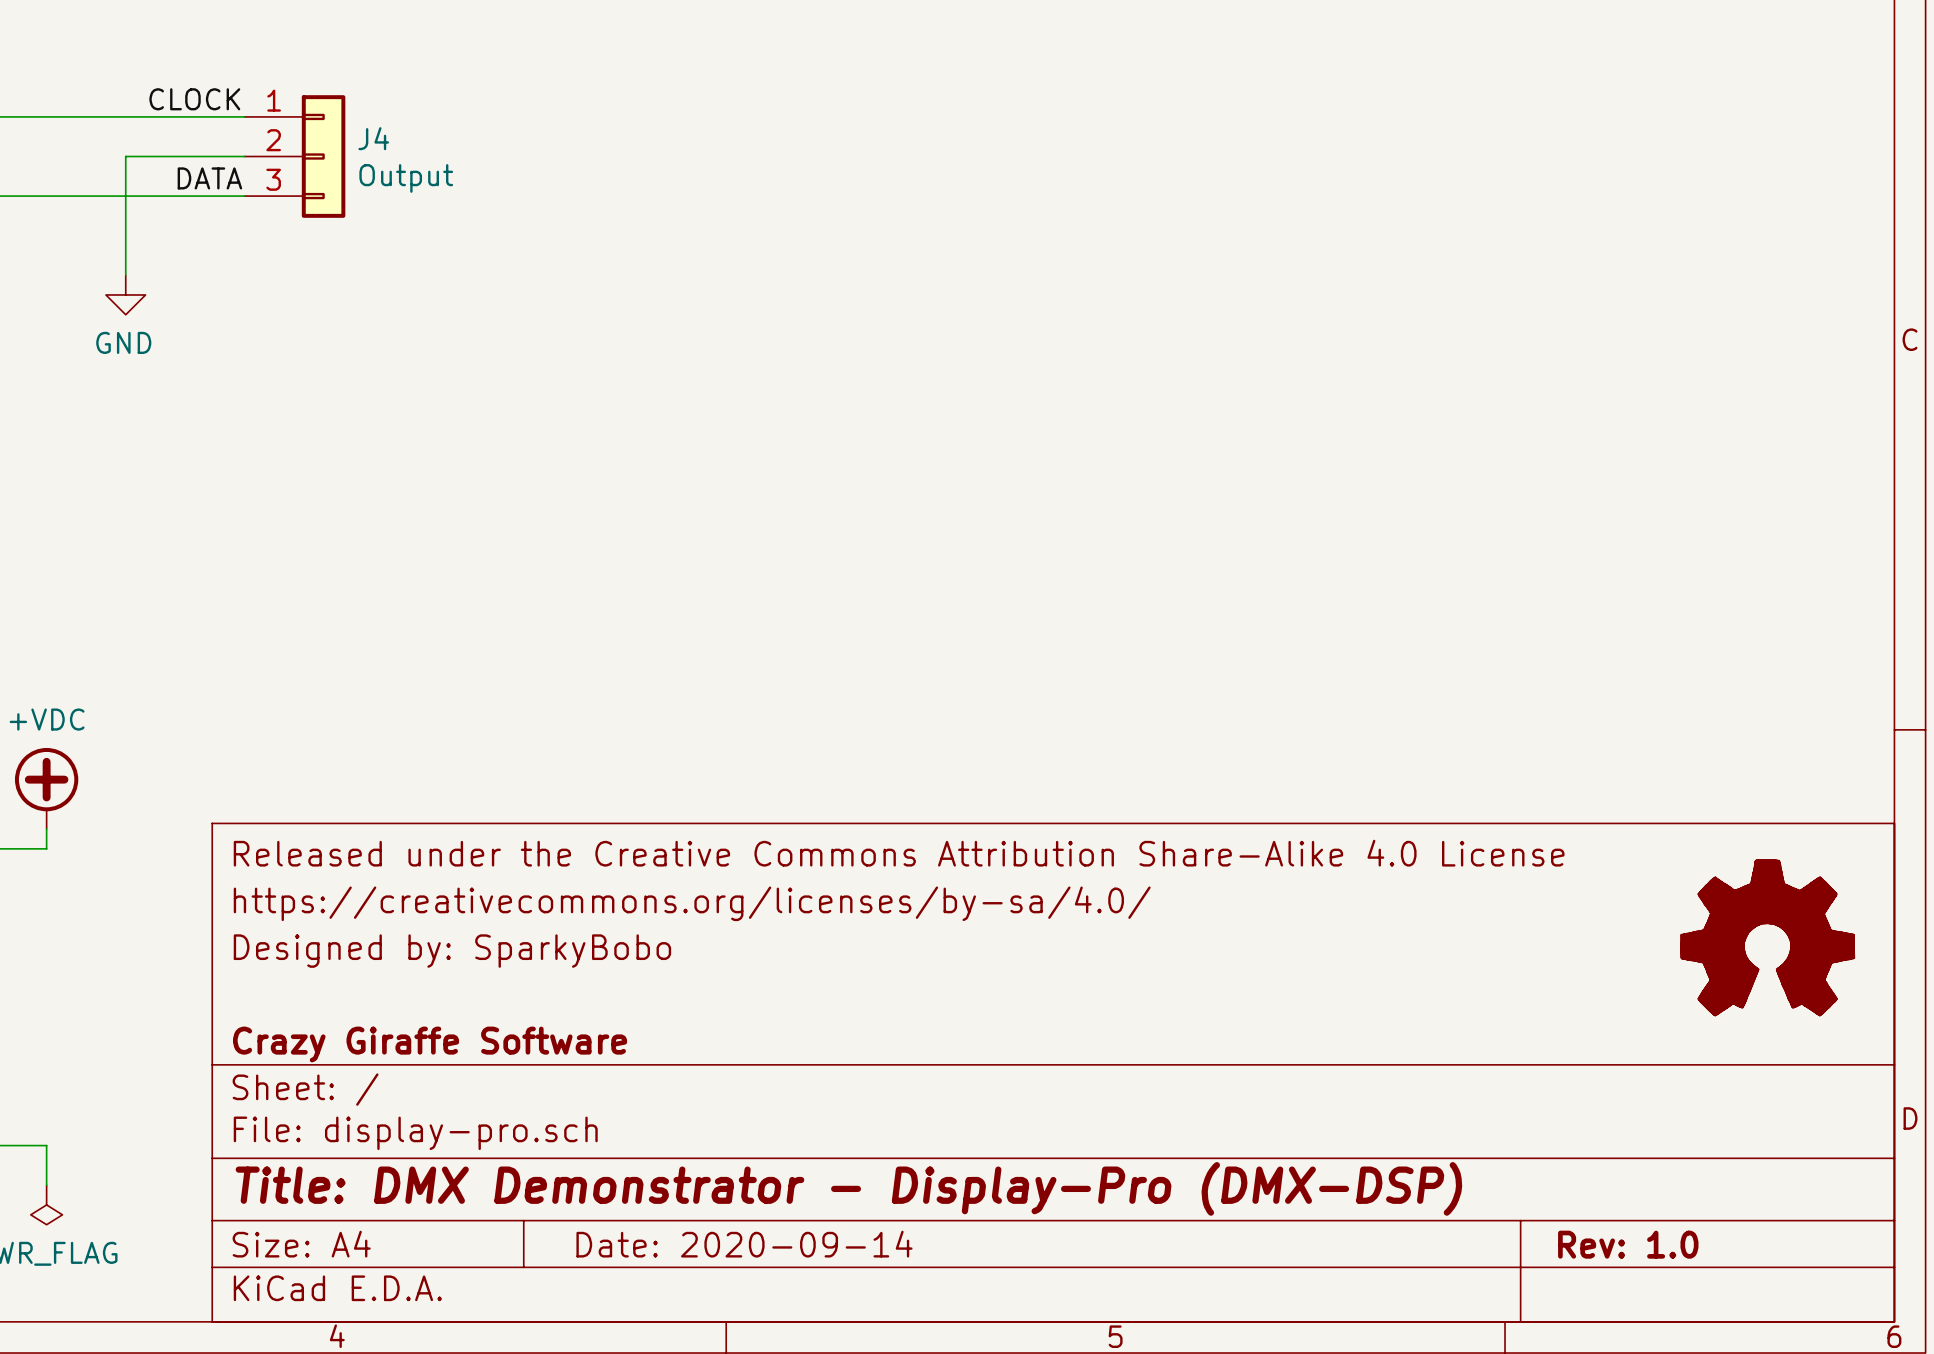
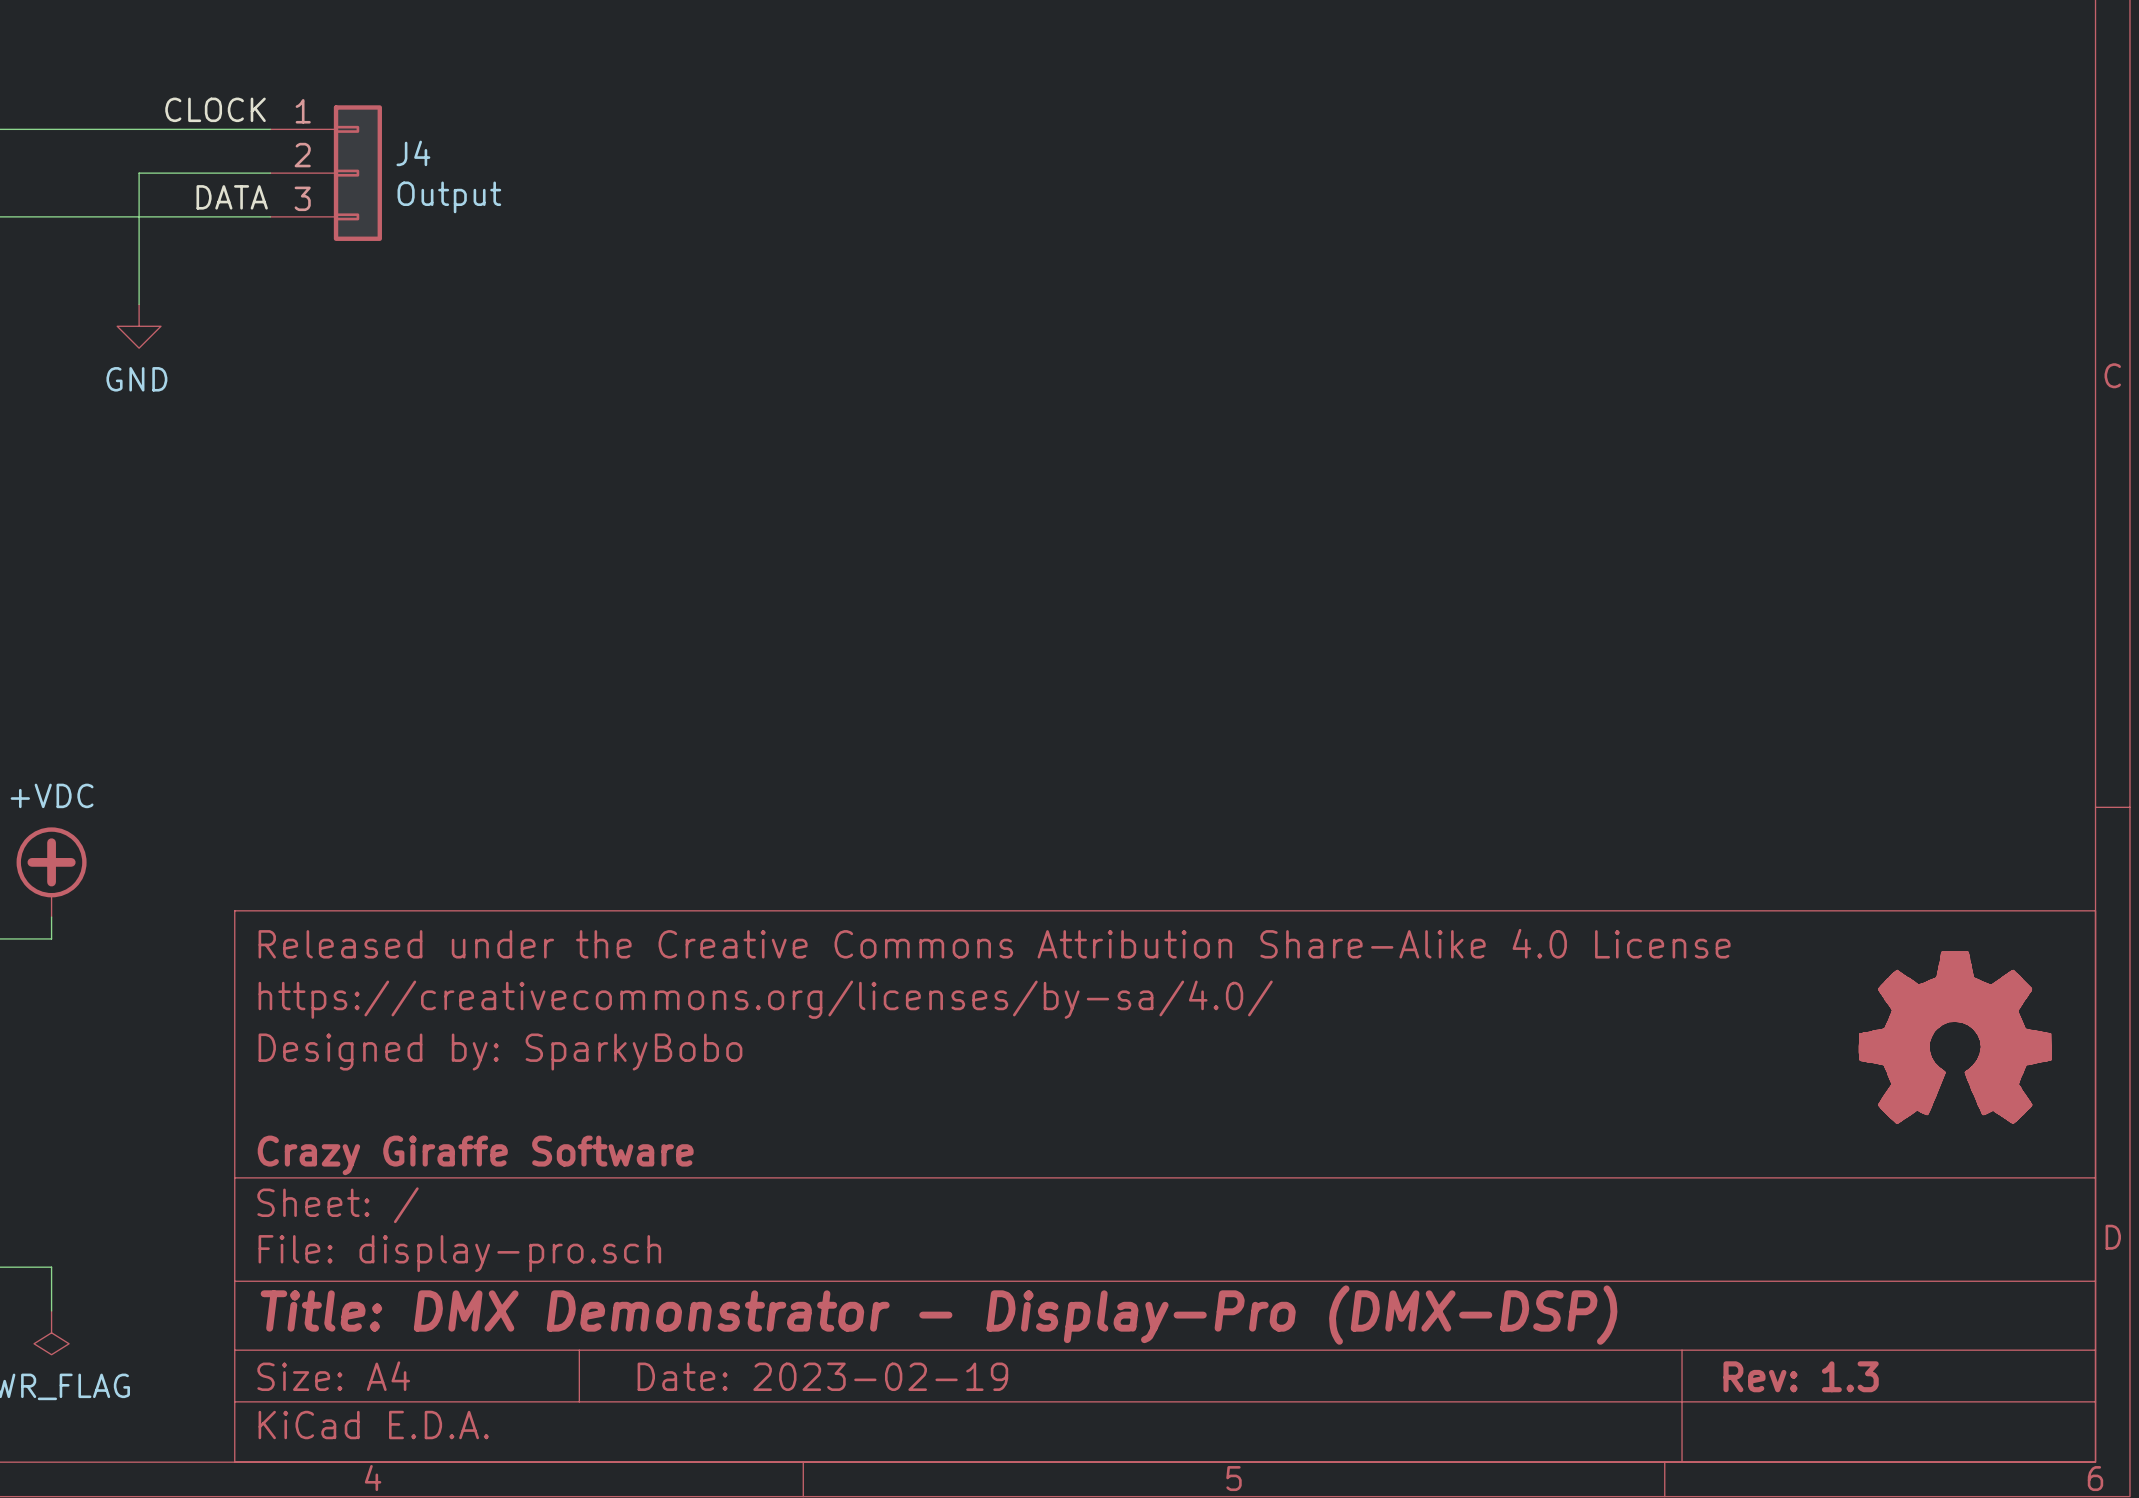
title block: Date: 2020-09-14 (744, 1244) -> Date: 2023-02-19 (822, 1376)
title block: Rev: 1.0 (1628, 1244) -> Rev: 1.3 (1801, 1376)

